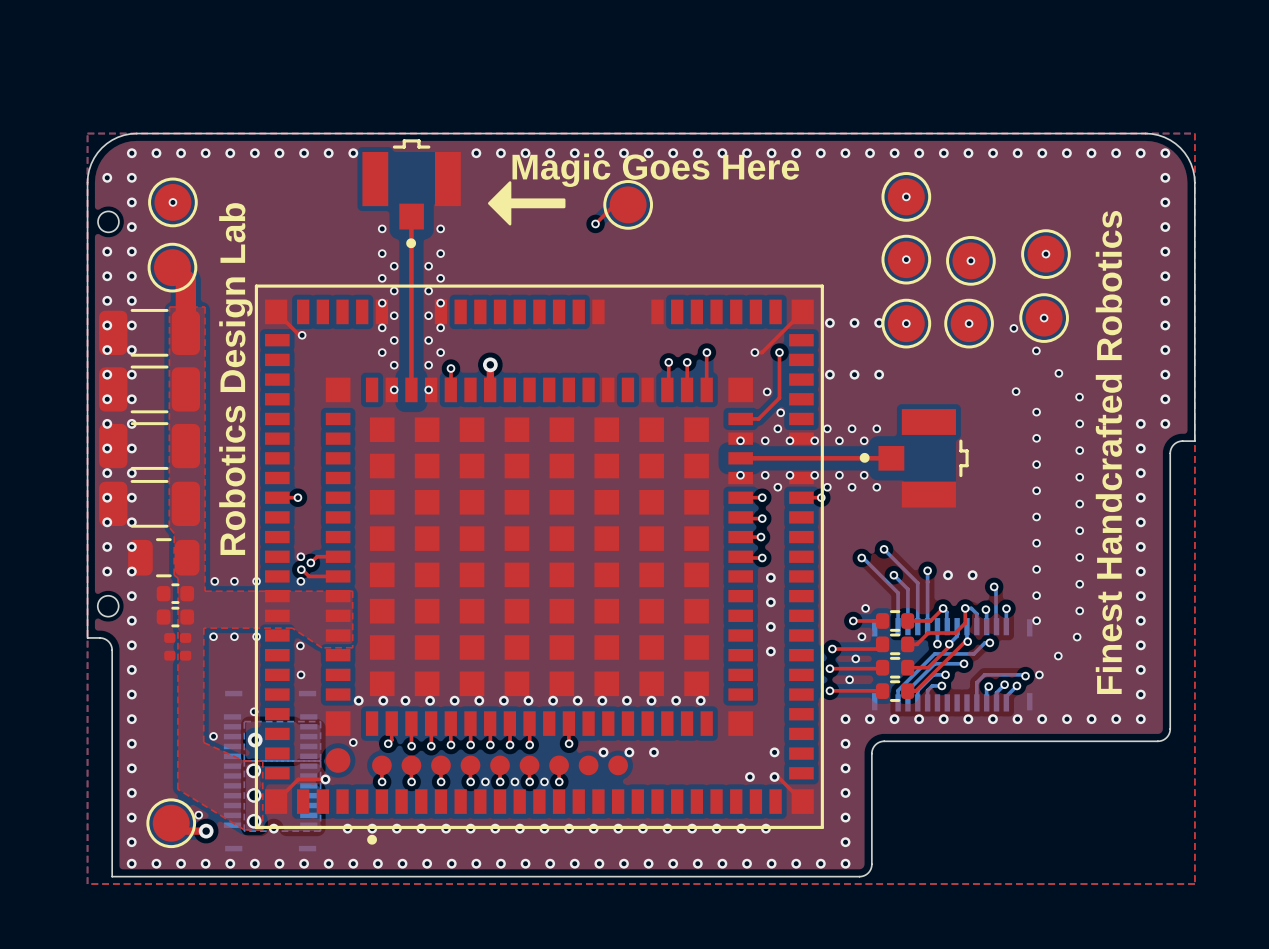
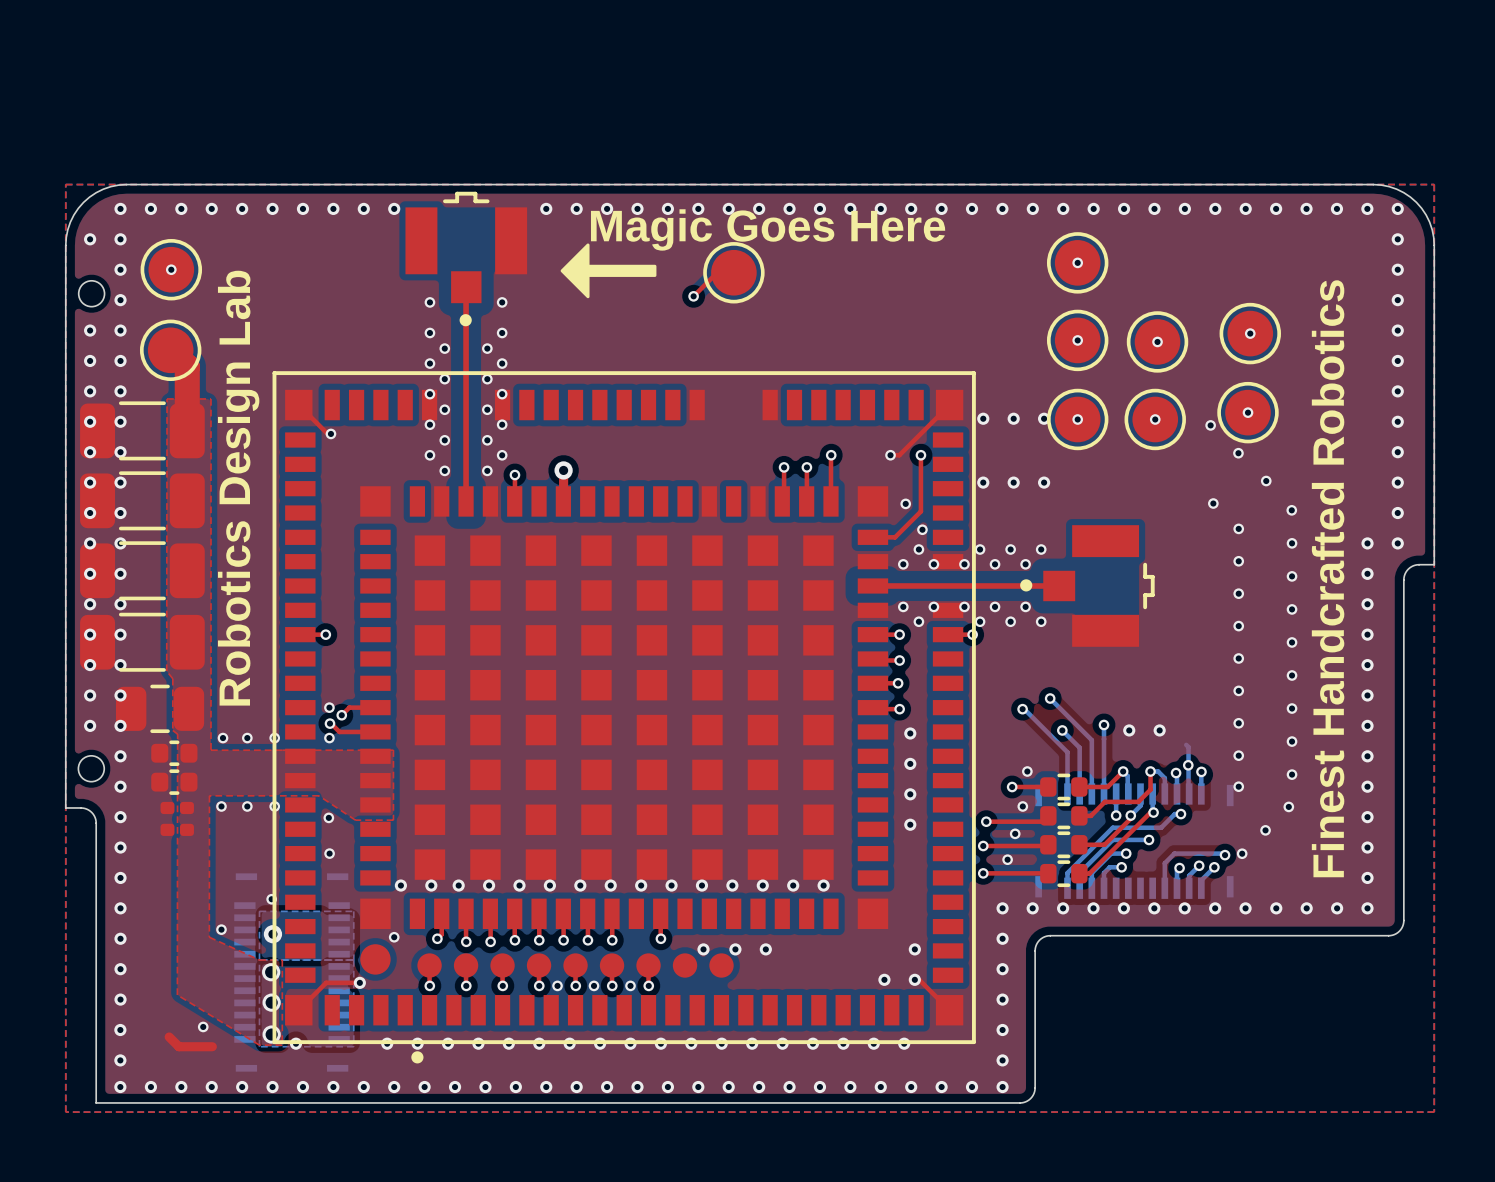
drawing shape: [219, 153, 1123, 695] -> [217, 209, 1345, 878]
via: (394, 389) -> none
via: (428, 389) -> none
via: (740, 440) -> none
via: (740, 475) -> none
via position: (994, 586) -> (1188, 765)
part: (171, 823) -> none
via: (206, 831) -> none

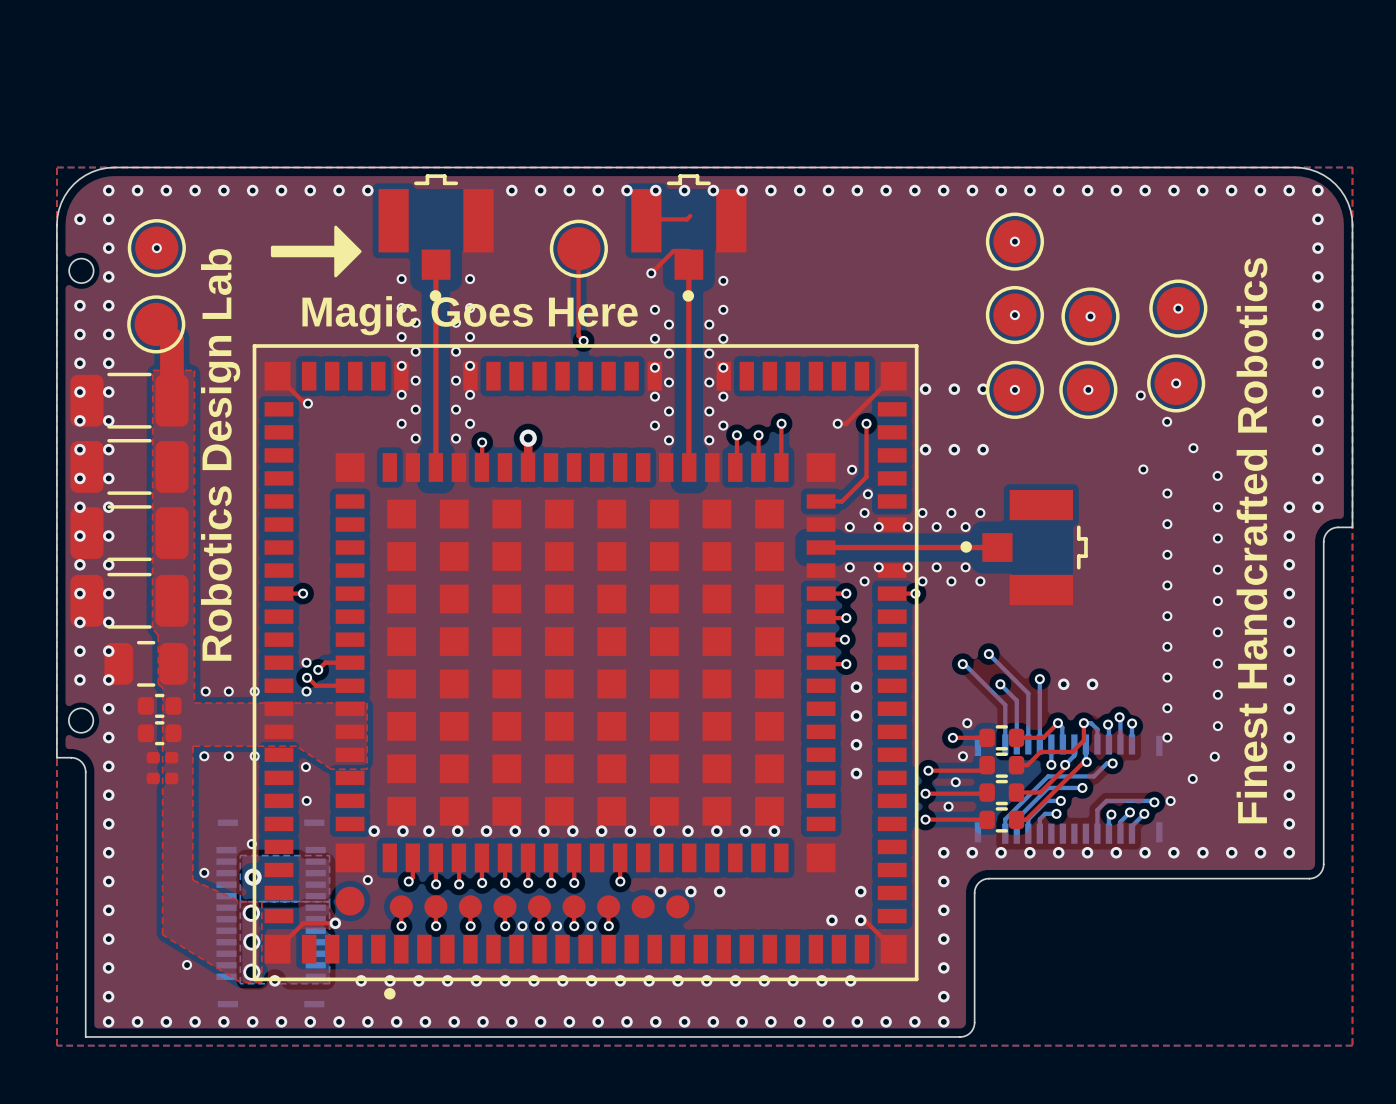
top track: none -> (690, 215) (686, 219) (650, 219)
part footprint: [703, 242, 765, 304] -> [631, 174, 747, 302]
drawing: [560, 243, 657, 299] -> none
drawing: none -> [270, 225, 362, 278]
top track: none -> (583, 245) (578, 250) (578, 335) (583, 340)
part: none -> (578, 248)
top track: none -> (688, 264) (688, 467)
via: none -> (723, 280)
via: none -> (654, 309)
via: none -> (723, 309)
via: none -> (669, 324)
via: none -> (709, 324)
via: none -> (654, 338)
via: none -> (723, 338)
via: none -> (583, 340)
via: none -> (669, 353)
via: none -> (709, 353)
via: none -> (654, 367)
via: none -> (723, 367)
via: none -> (669, 382)
via: none -> (709, 382)
via: none -> (654, 396)
via: none -> (723, 396)
via: none -> (669, 411)
via: none -> (709, 411)
via: none -> (654, 425)
via: none -> (723, 425)
via: none -> (669, 440)
via: none -> (709, 440)
bottom track: (1186, 744) (1188, 747) (1188, 793) -> (1119, 717) (1120, 744)
top track: (169, 1036) (178, 1046) (212, 1046) -> none

